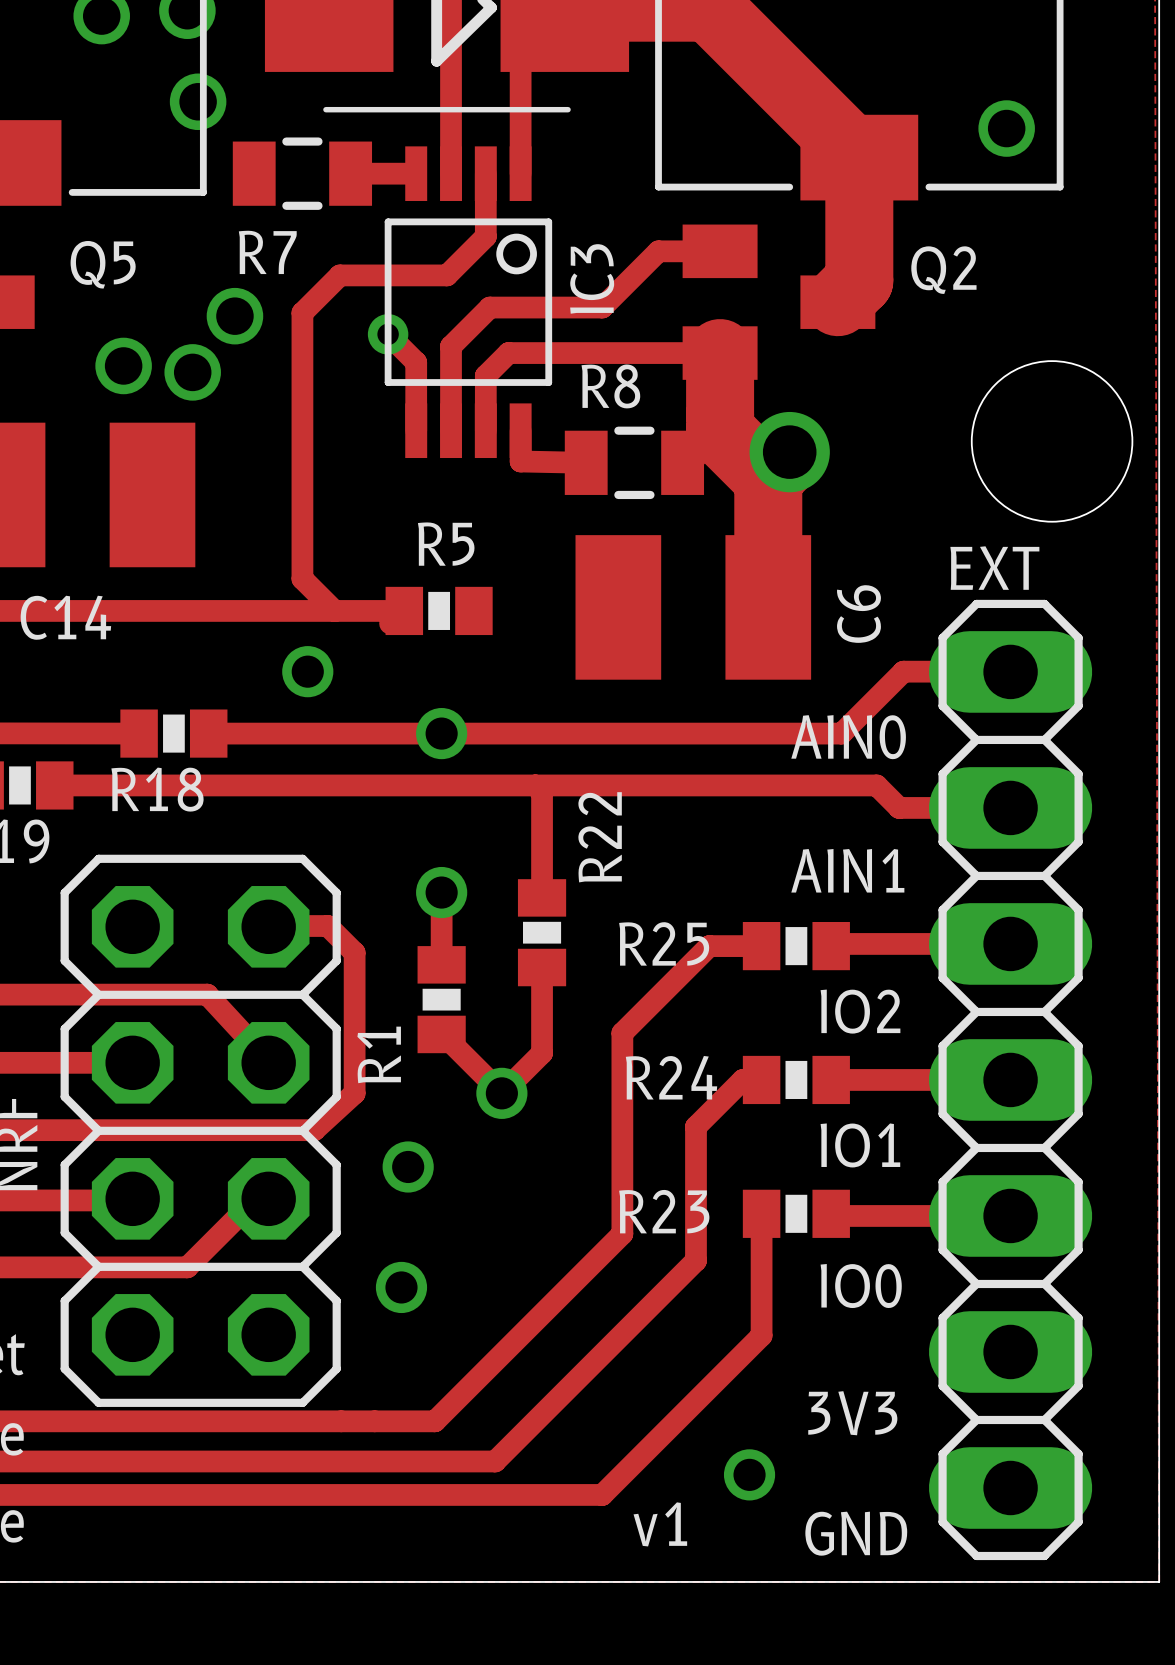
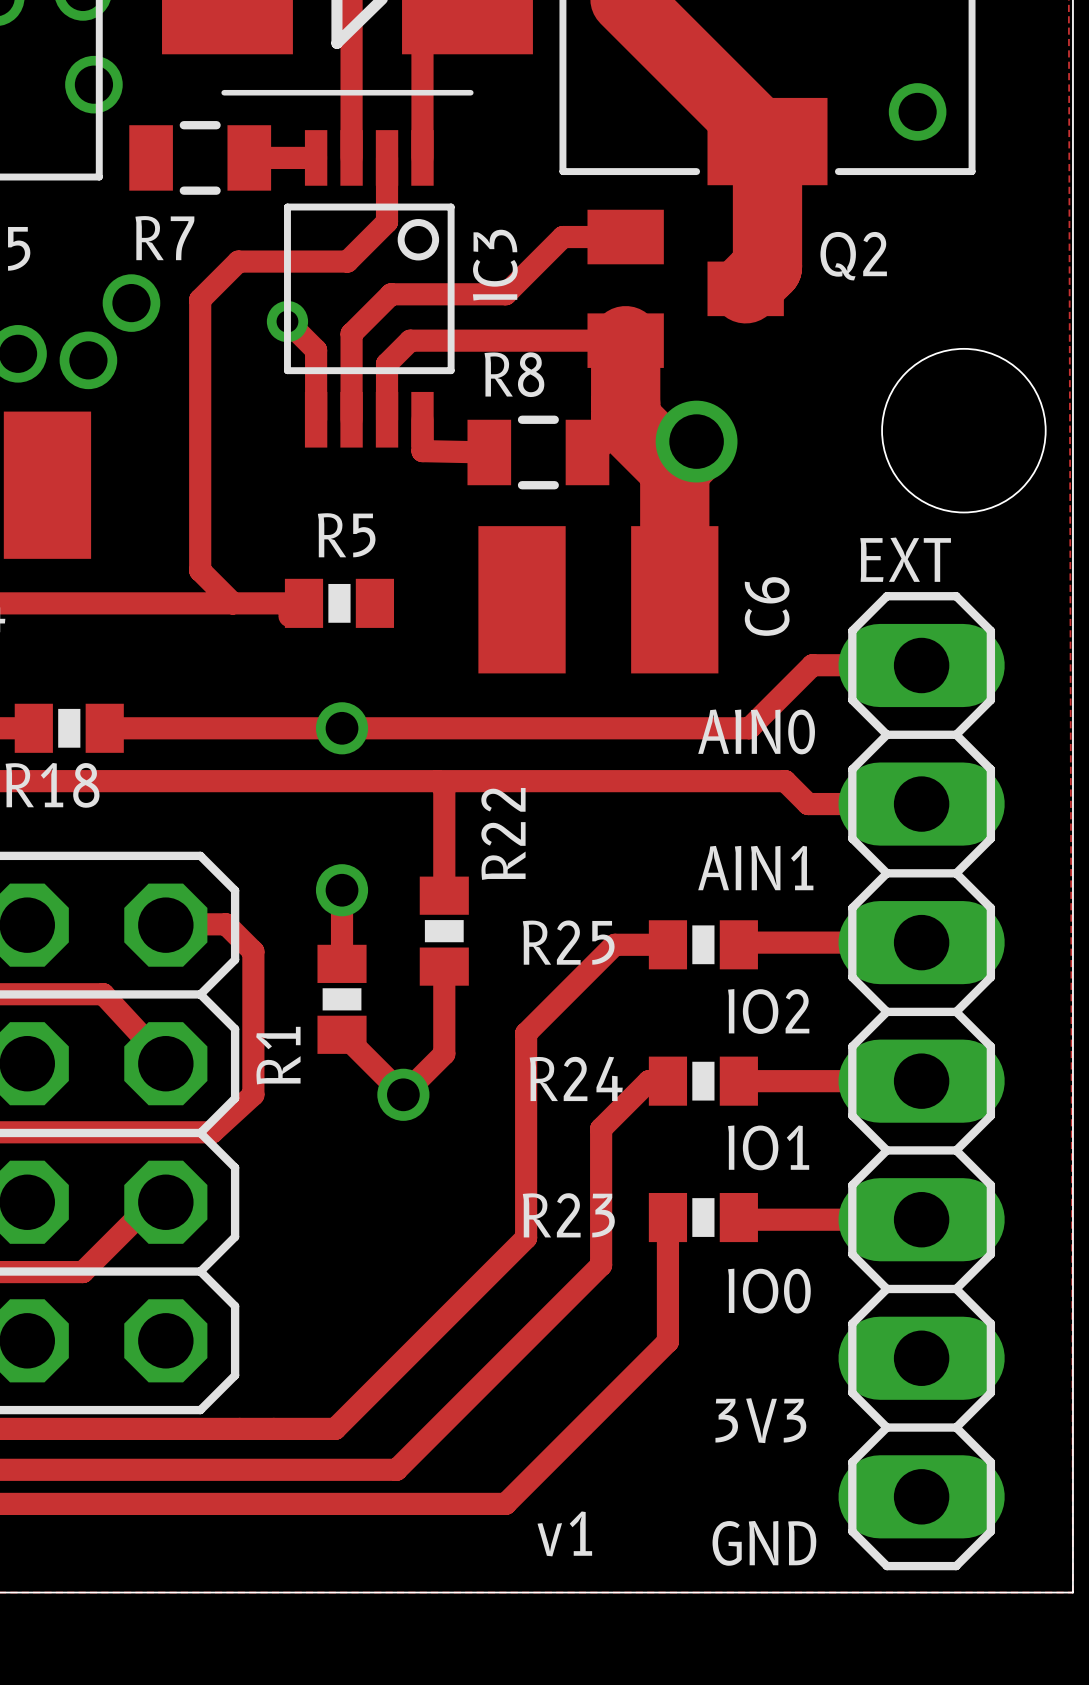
via: (307, 671) -> none
via: (408, 1166) -> none
via: (401, 1287) -> none
via: (749, 1474) -> none

